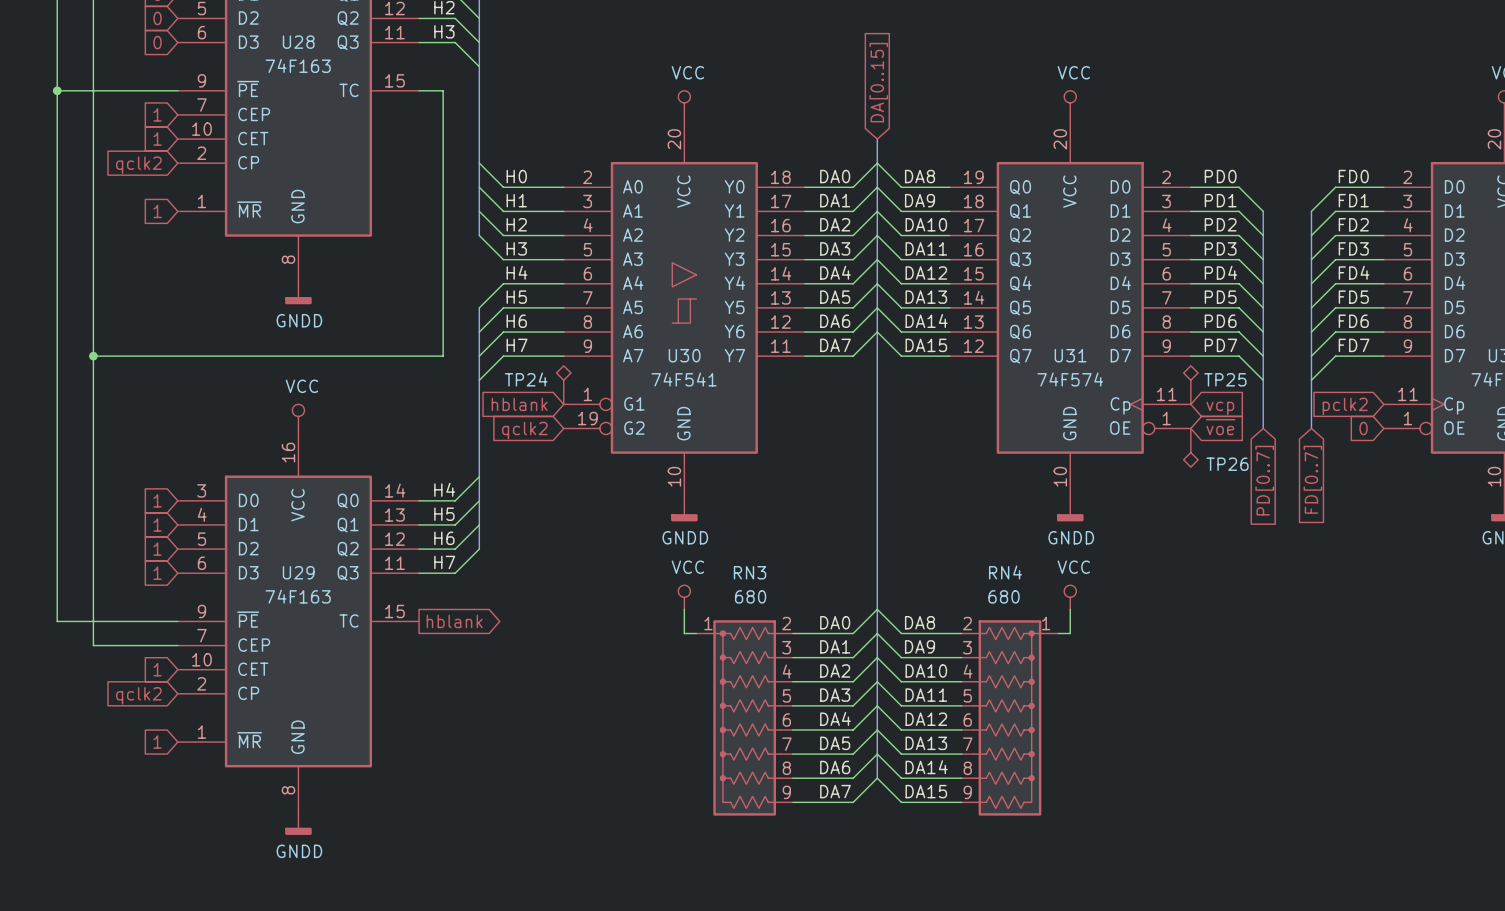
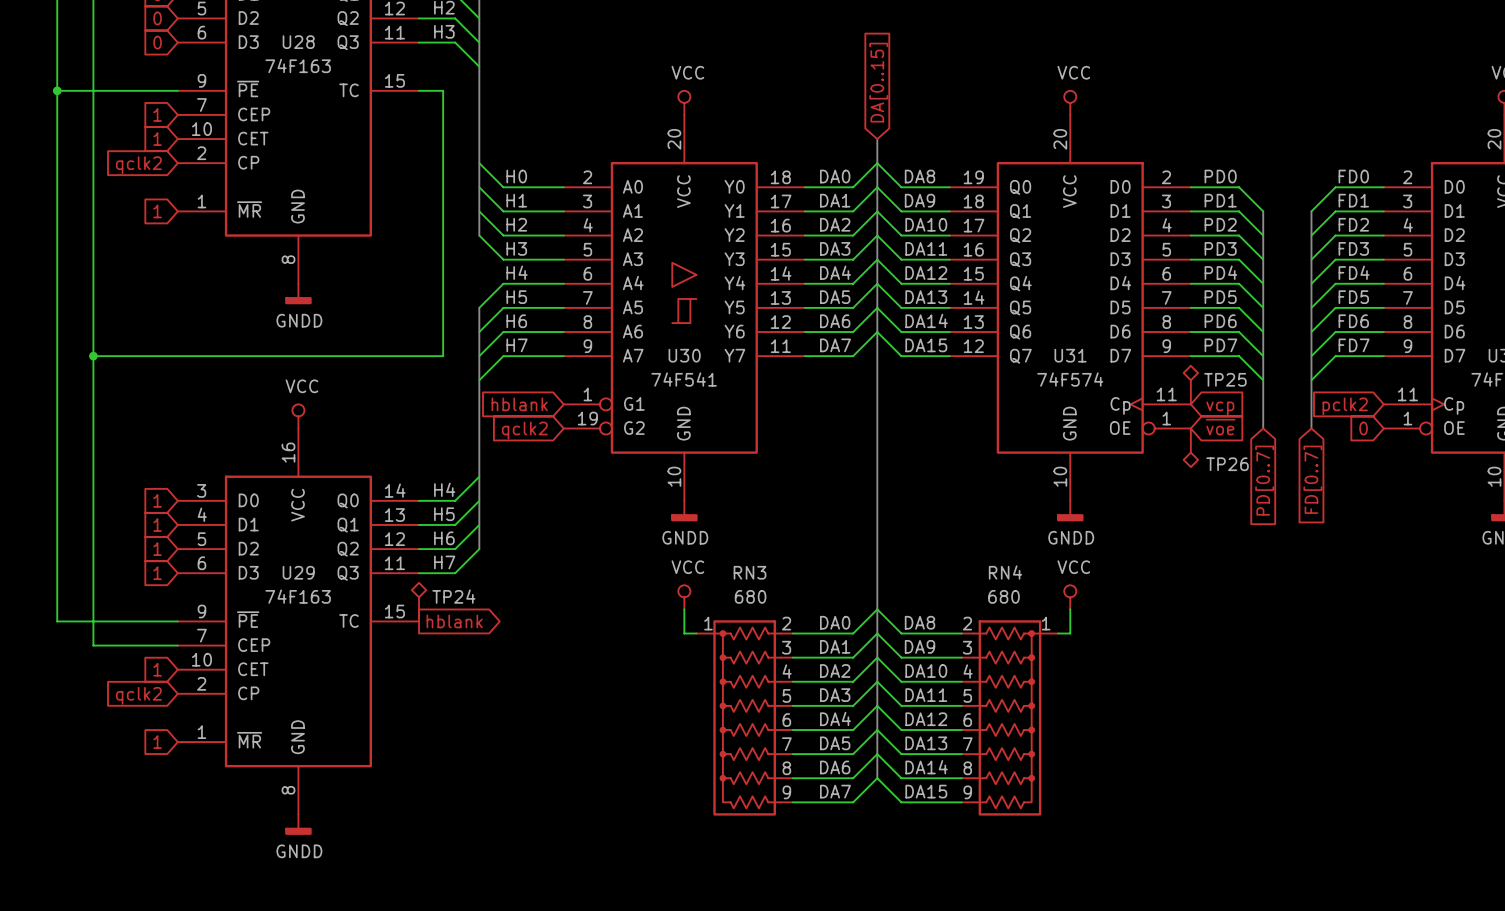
TP24 name position: TP24 (526, 379) -> TP24 (453, 596)
TP24 position: (563, 385) -> (419, 602)

